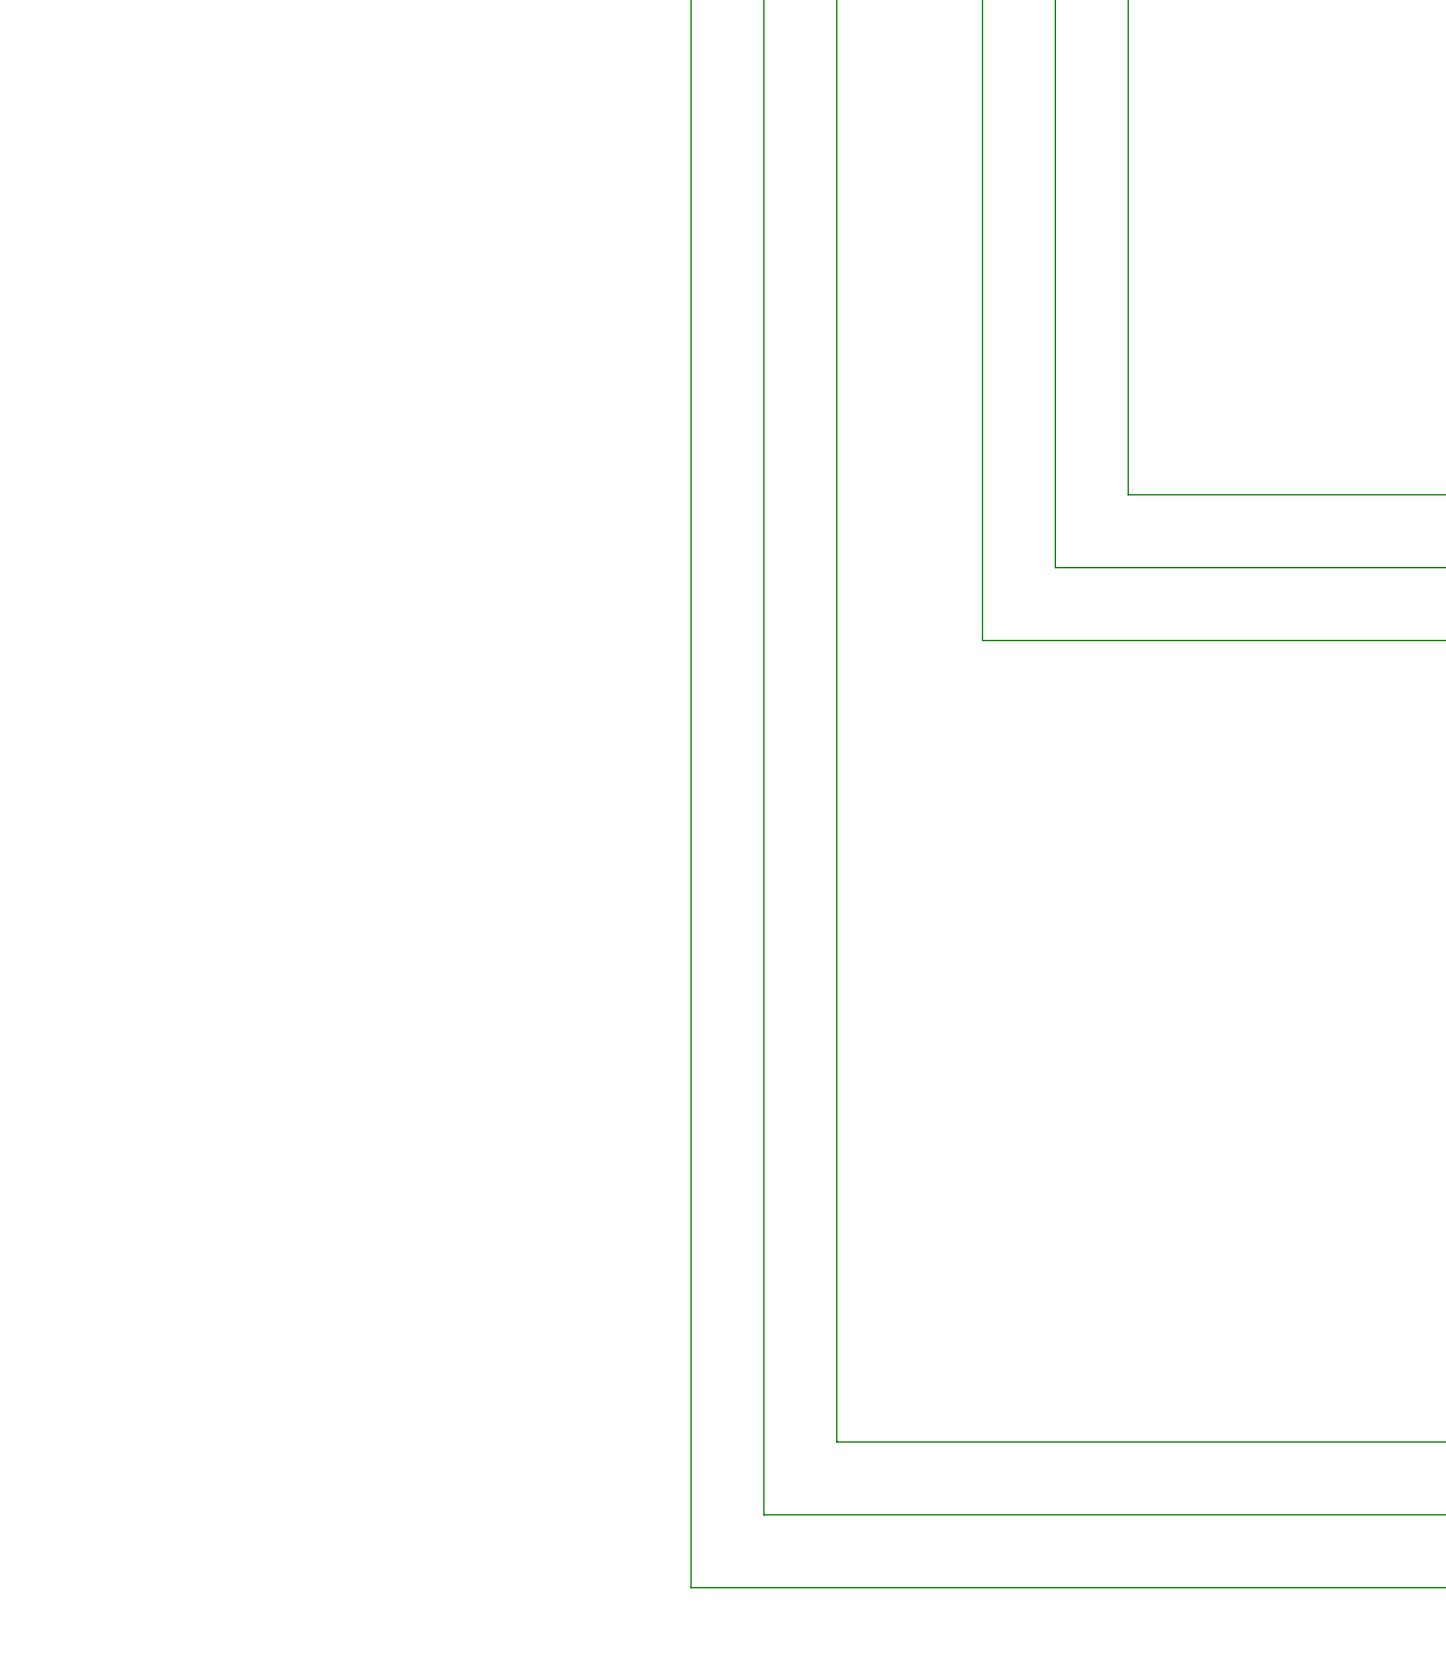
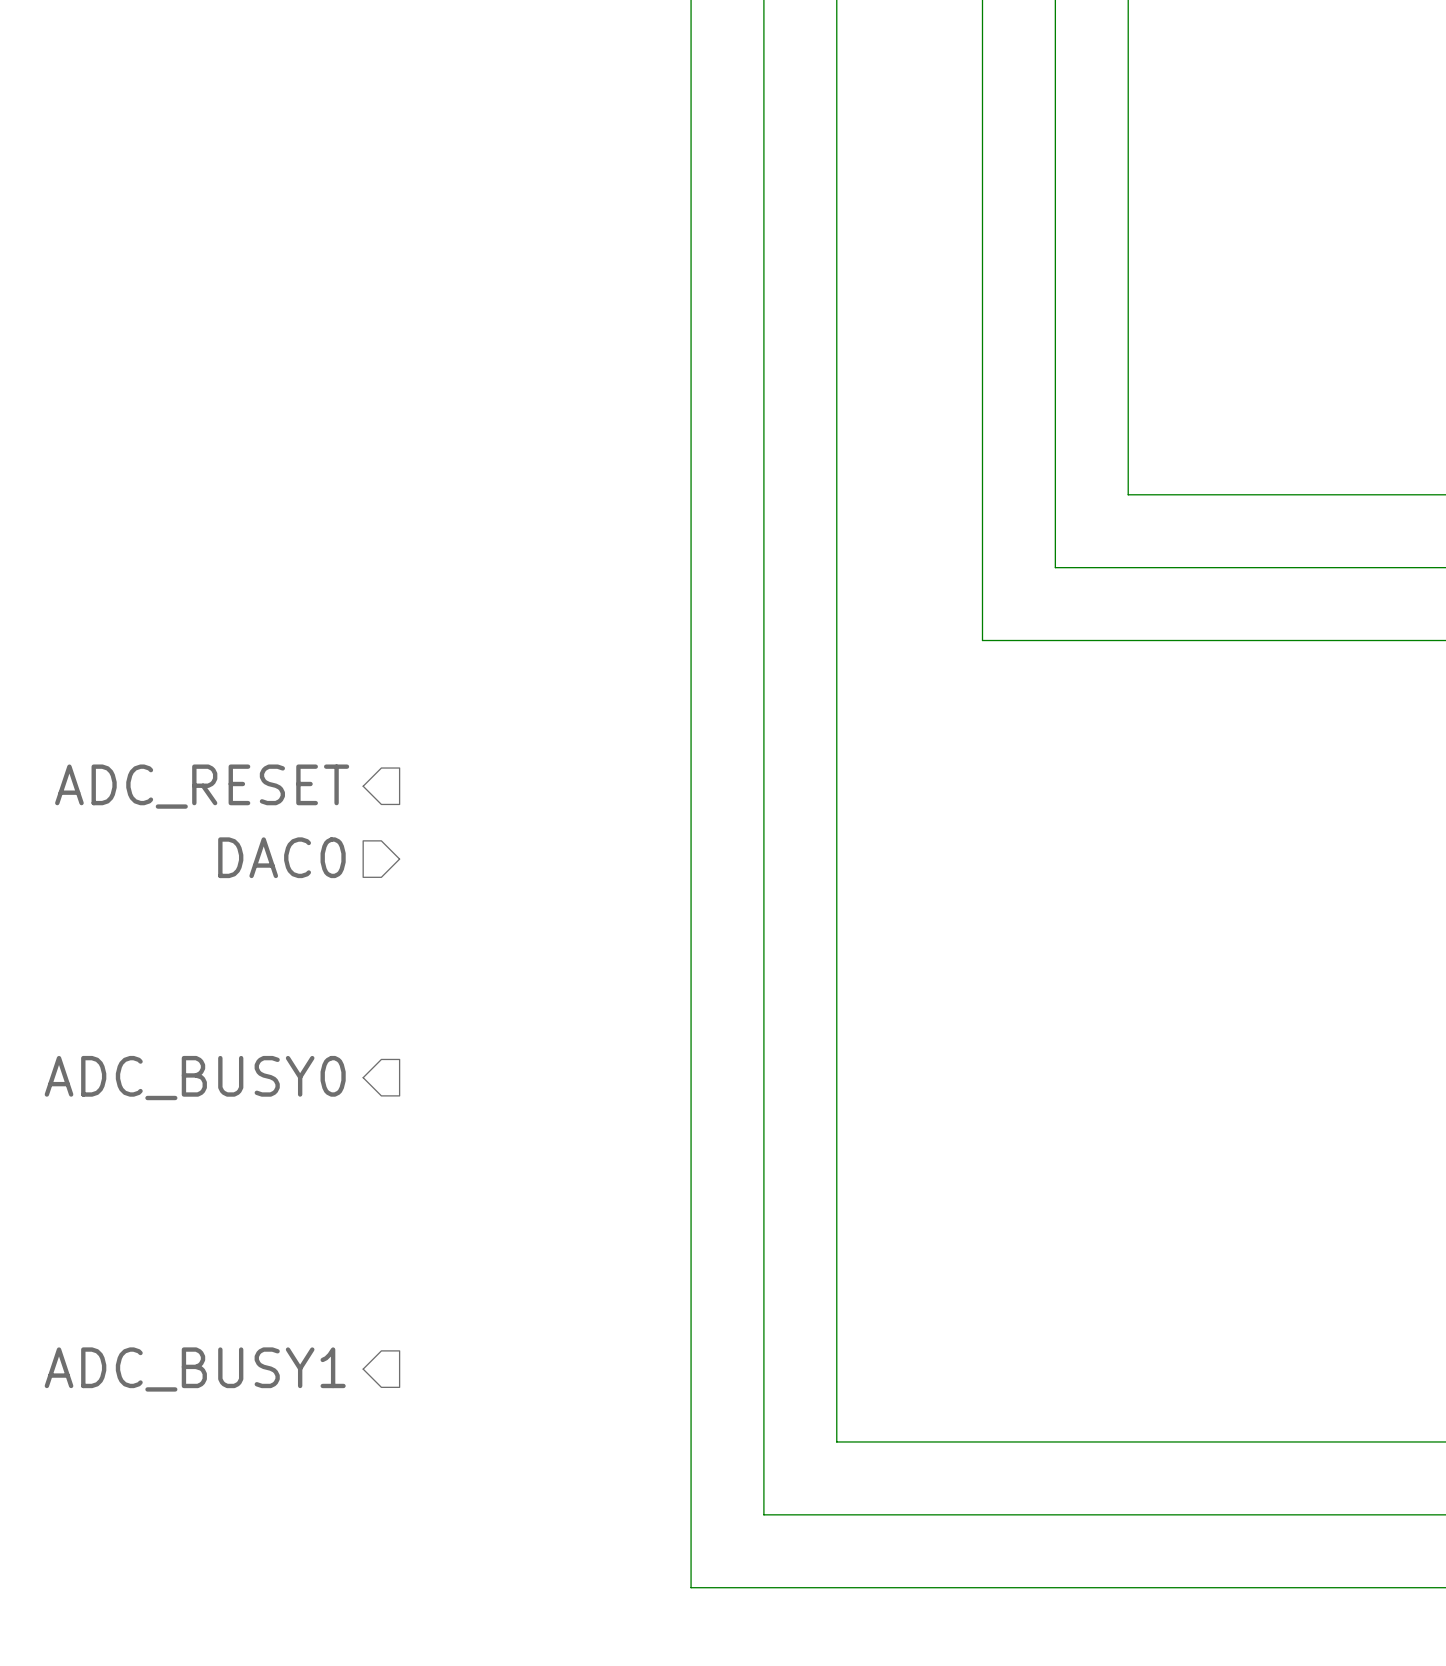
sheet pin: none -> ADC_RESET (202, 786)
sheet pin: none -> DAC0 (281, 857)
sheet pin: none -> ADC_BUSY0 (195, 1078)
sheet pin: none -> ADC_BUSY1 (195, 1369)

